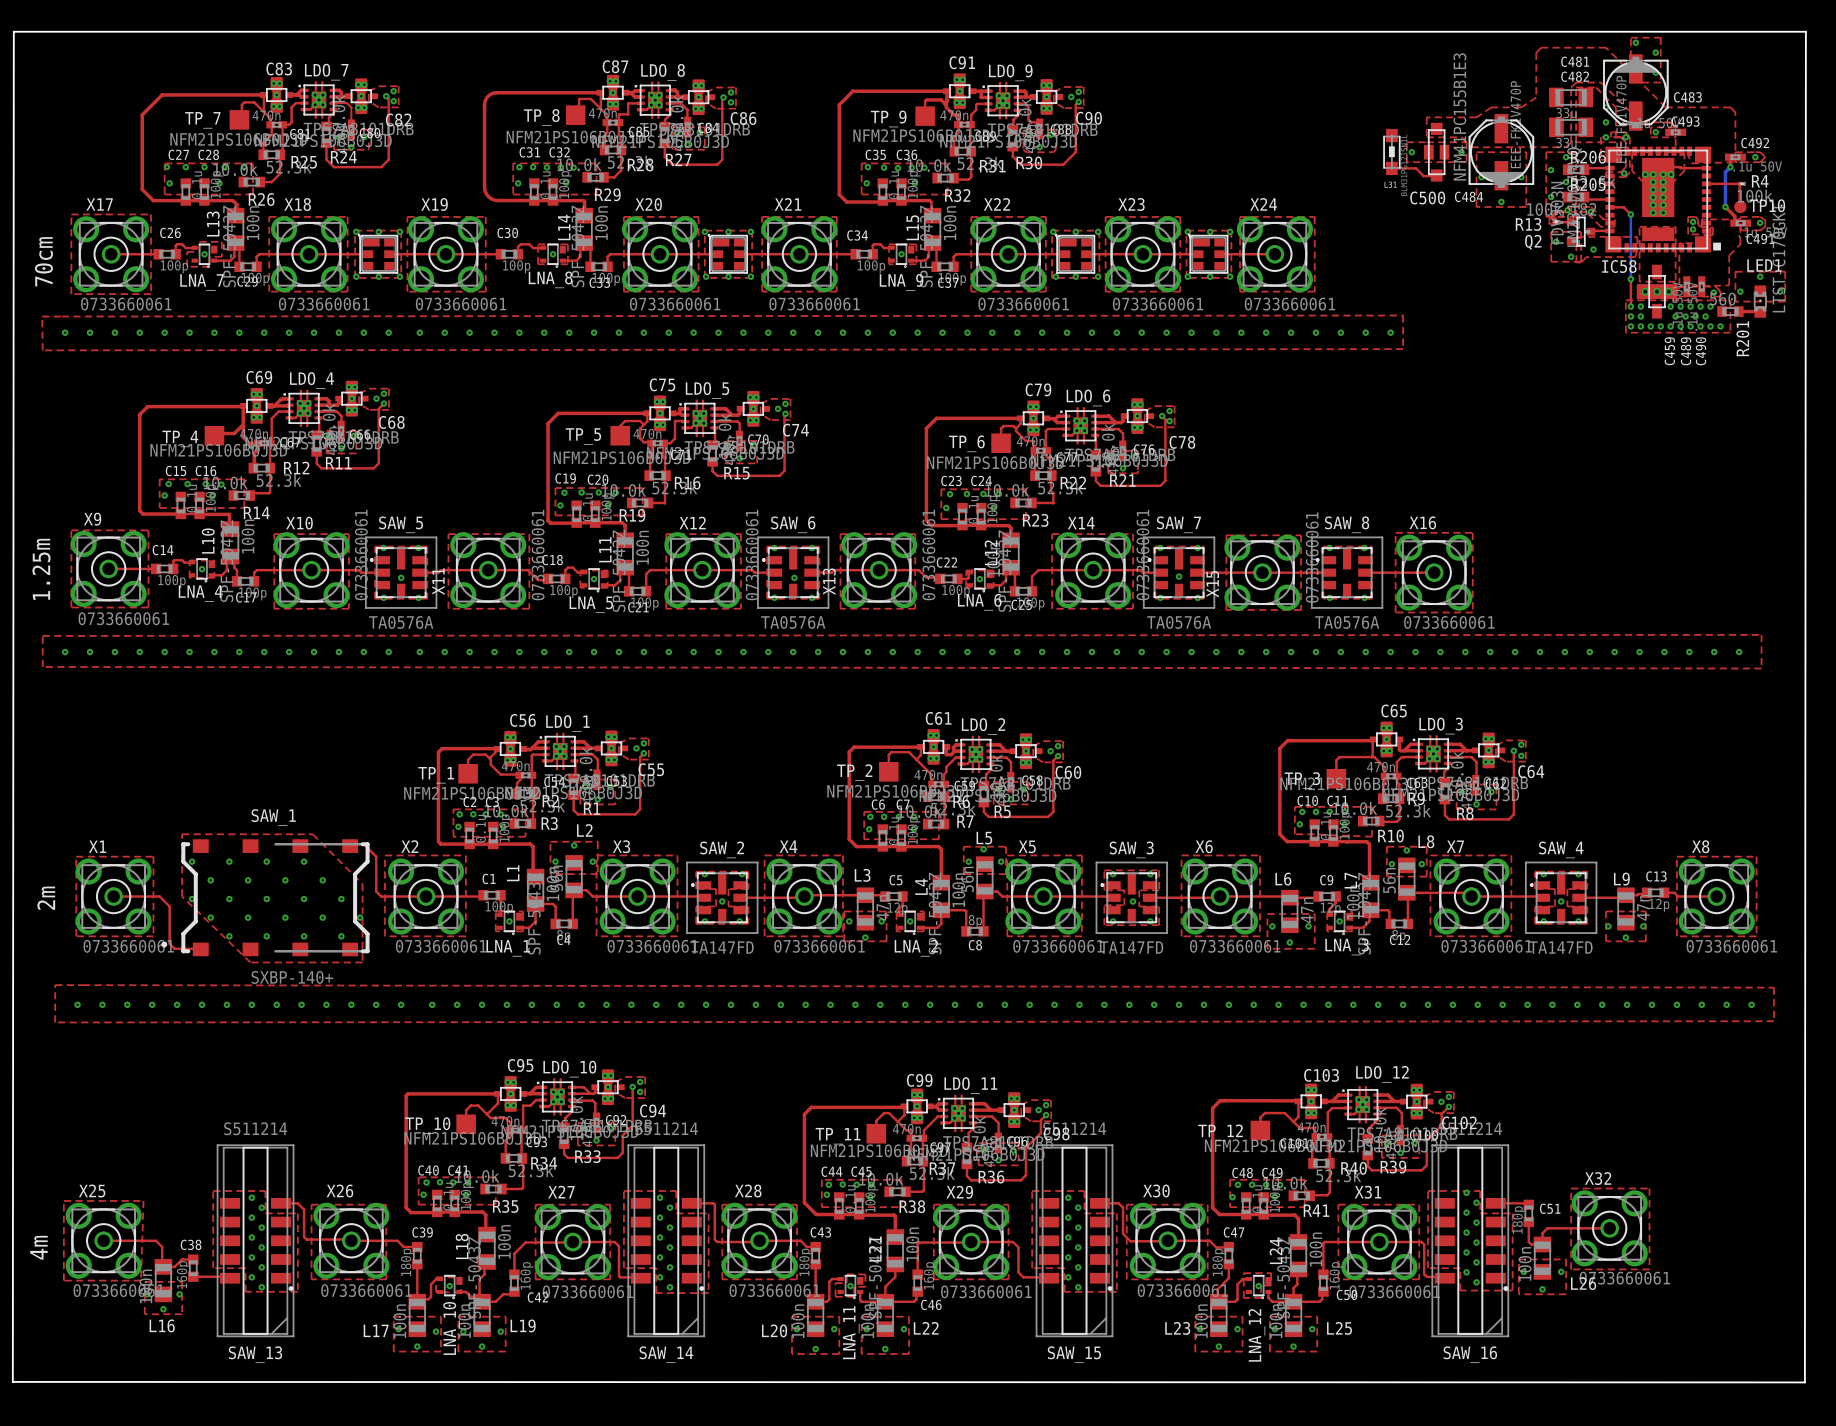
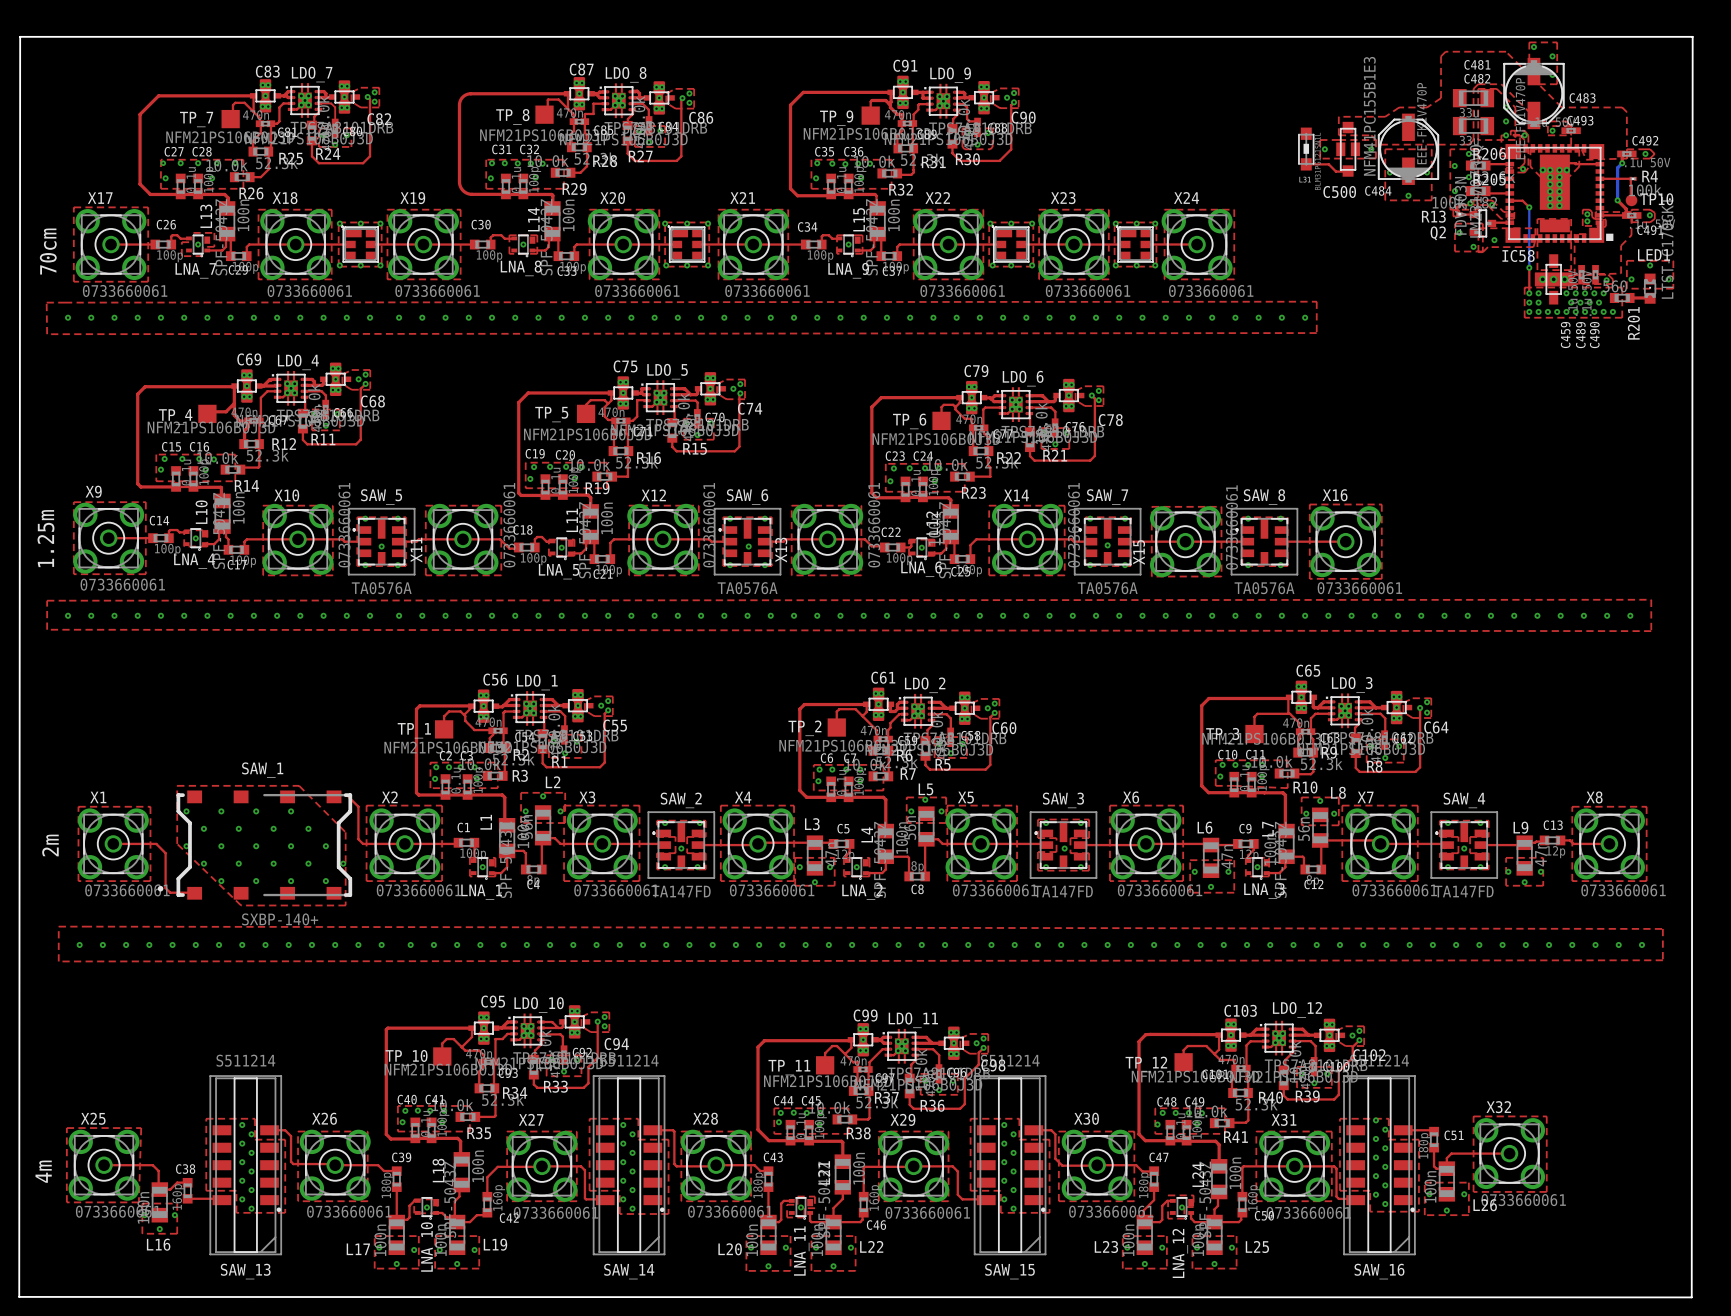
top track: none -> (1599, 215) (1626, 215)

